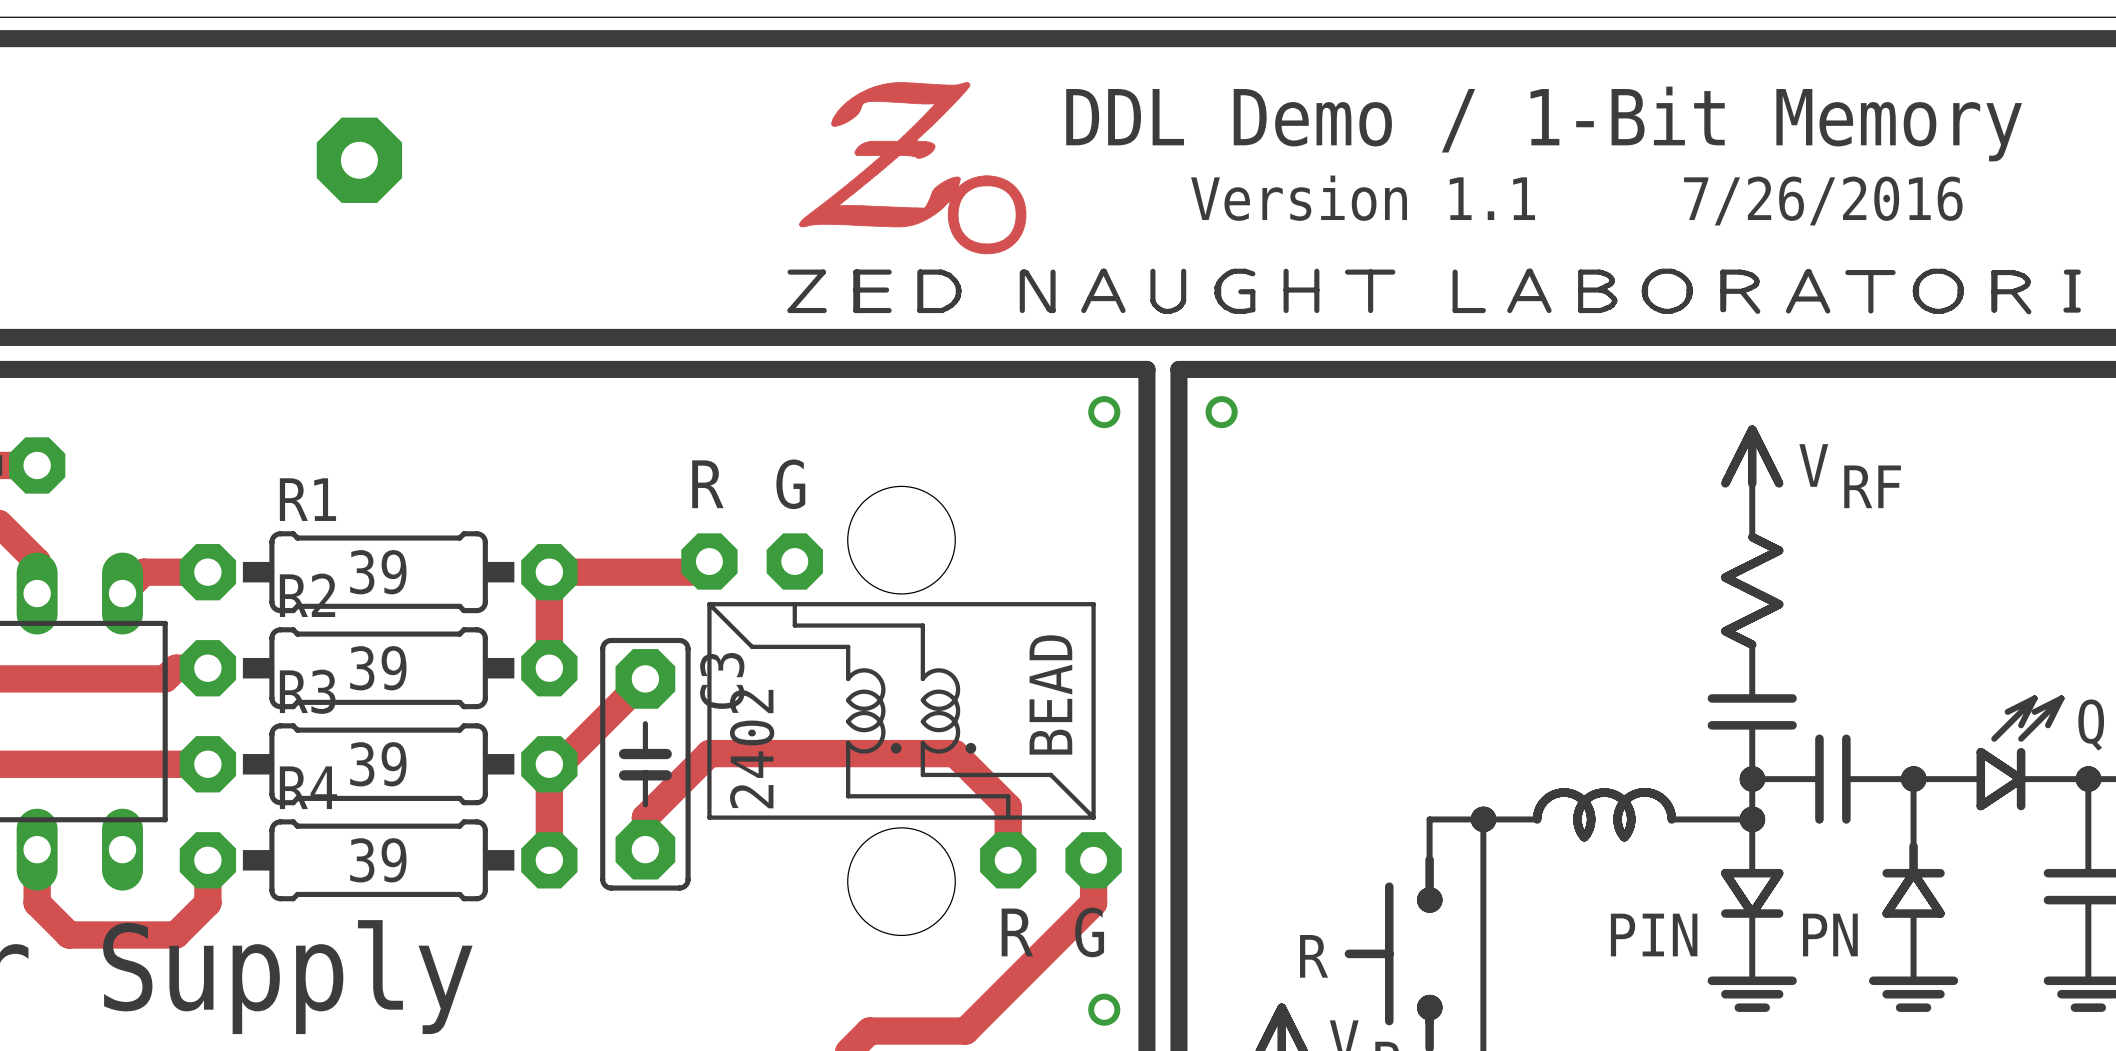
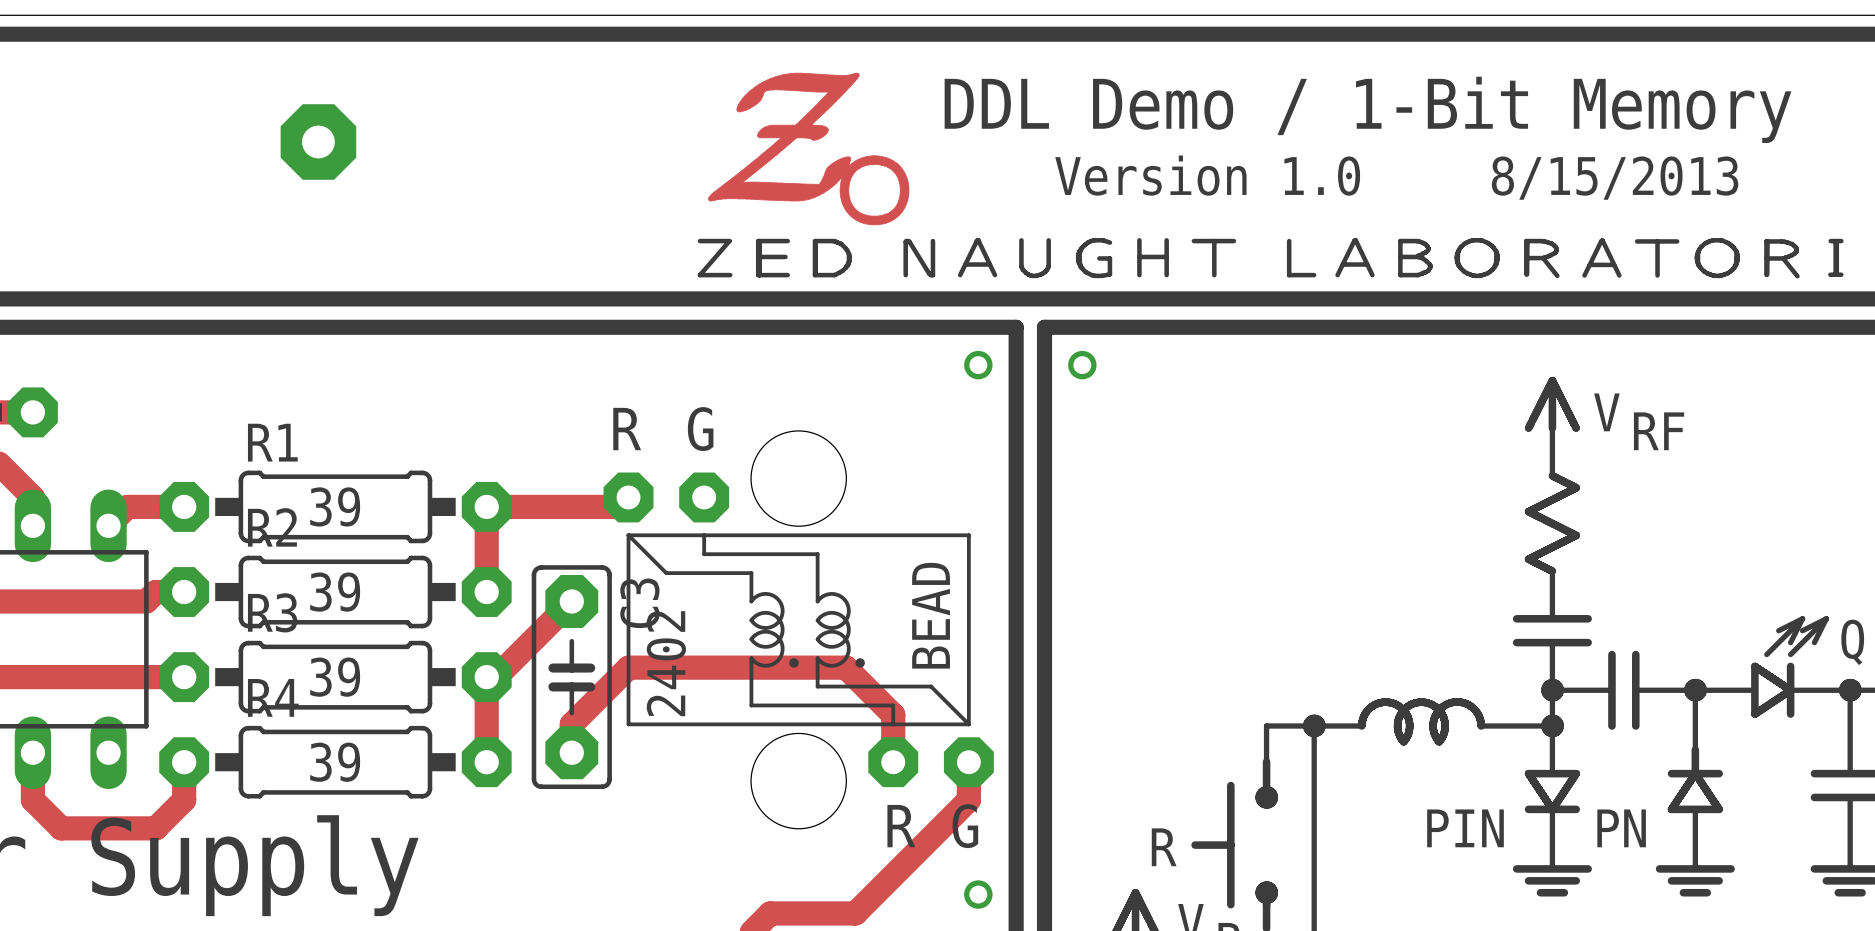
text: Version 1.1 (1363, 198) -> Version 1.0 (1207, 175)
text: 7/26/2016 (1823, 201) -> 8/15/2013 (1615, 178)

